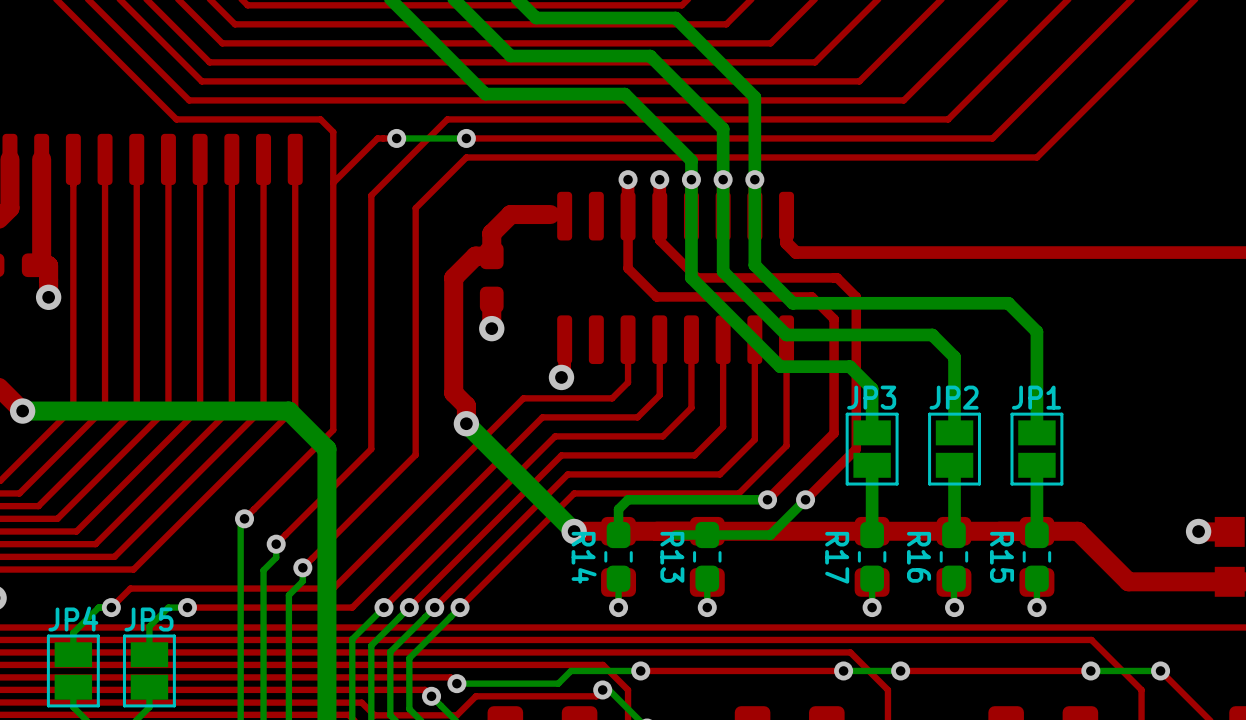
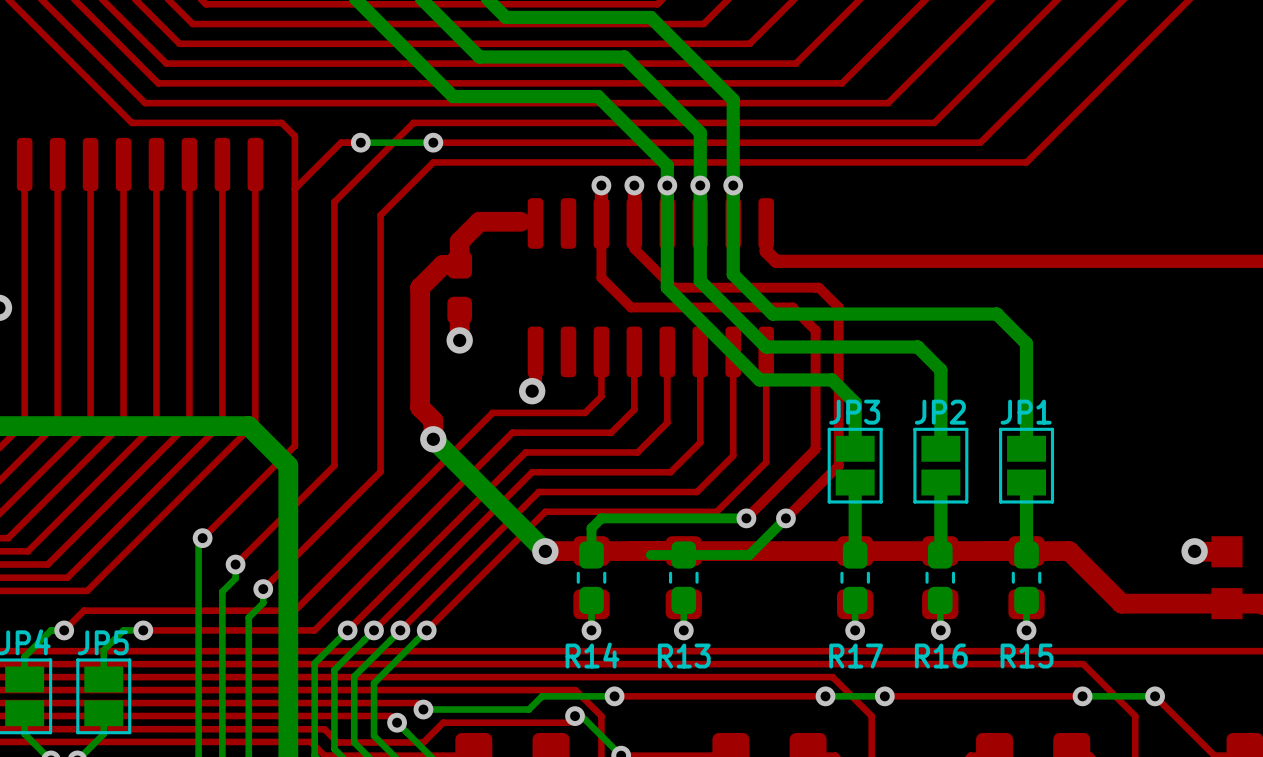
R14 name rotation: 0° (584, 557) -> 90° counterclockwise (592, 655)
R14 name position: R14 (584, 557) -> R14 (592, 655)
R13 name rotation: 0° (672, 557) -> 90° counterclockwise (684, 656)
R13 name position: R13 (672, 557) -> R13 (684, 656)
R17 name rotation: 0° (837, 557) -> 90° counterclockwise (856, 656)
R17 name position: R17 (837, 557) -> R17 (856, 656)
R16 name rotation: 0° (919, 557) -> 90° counterclockwise (941, 656)
R16 name position: R16 (919, 557) -> R16 (941, 656)
R15 name rotation: 0° (1002, 557) -> 90° counterclockwise (1027, 656)
R15 name position: R15 (1002, 557) -> R15 (1027, 656)

